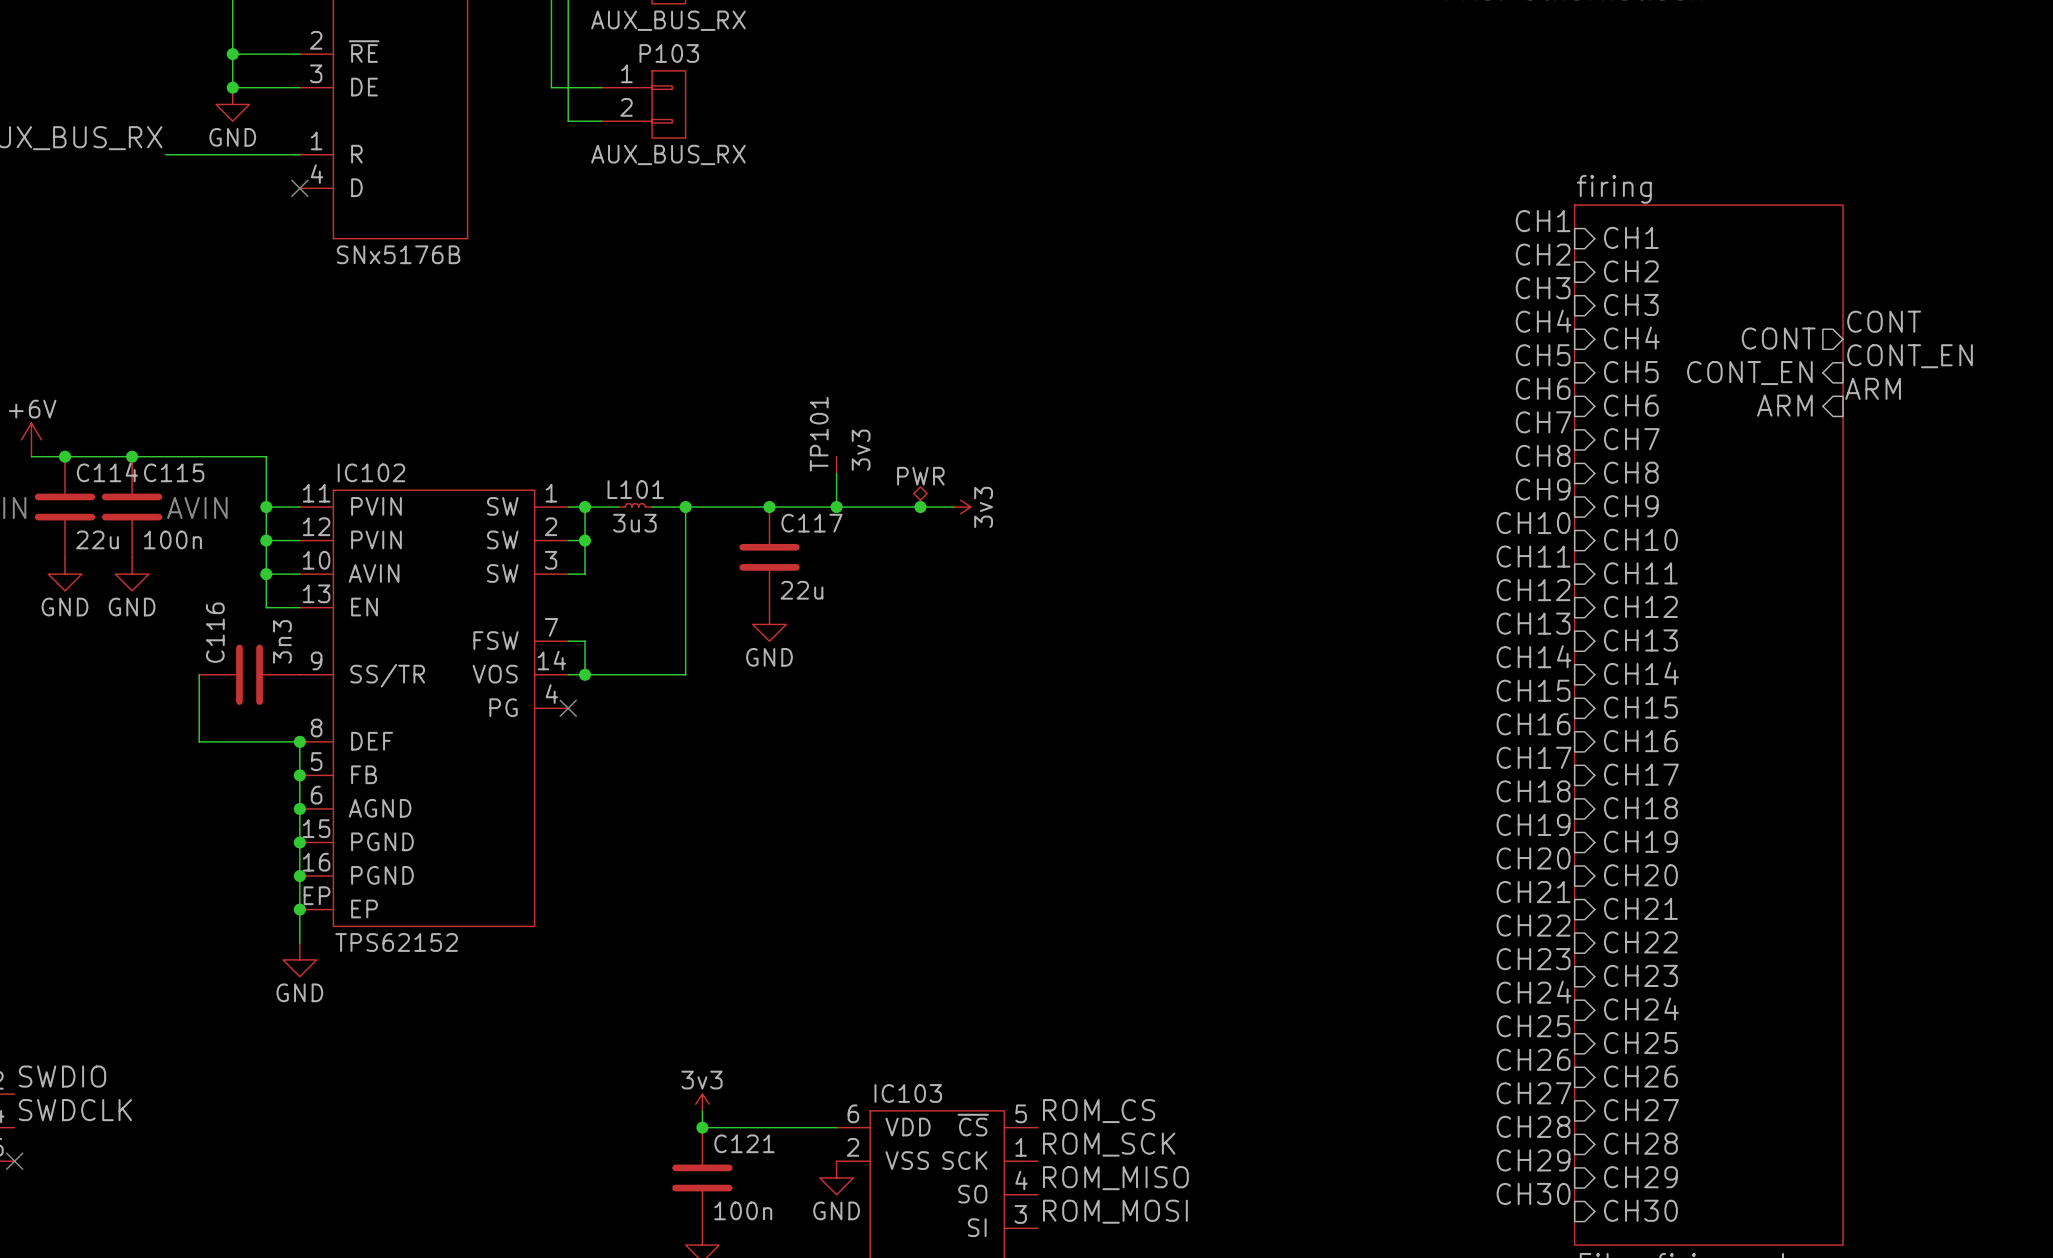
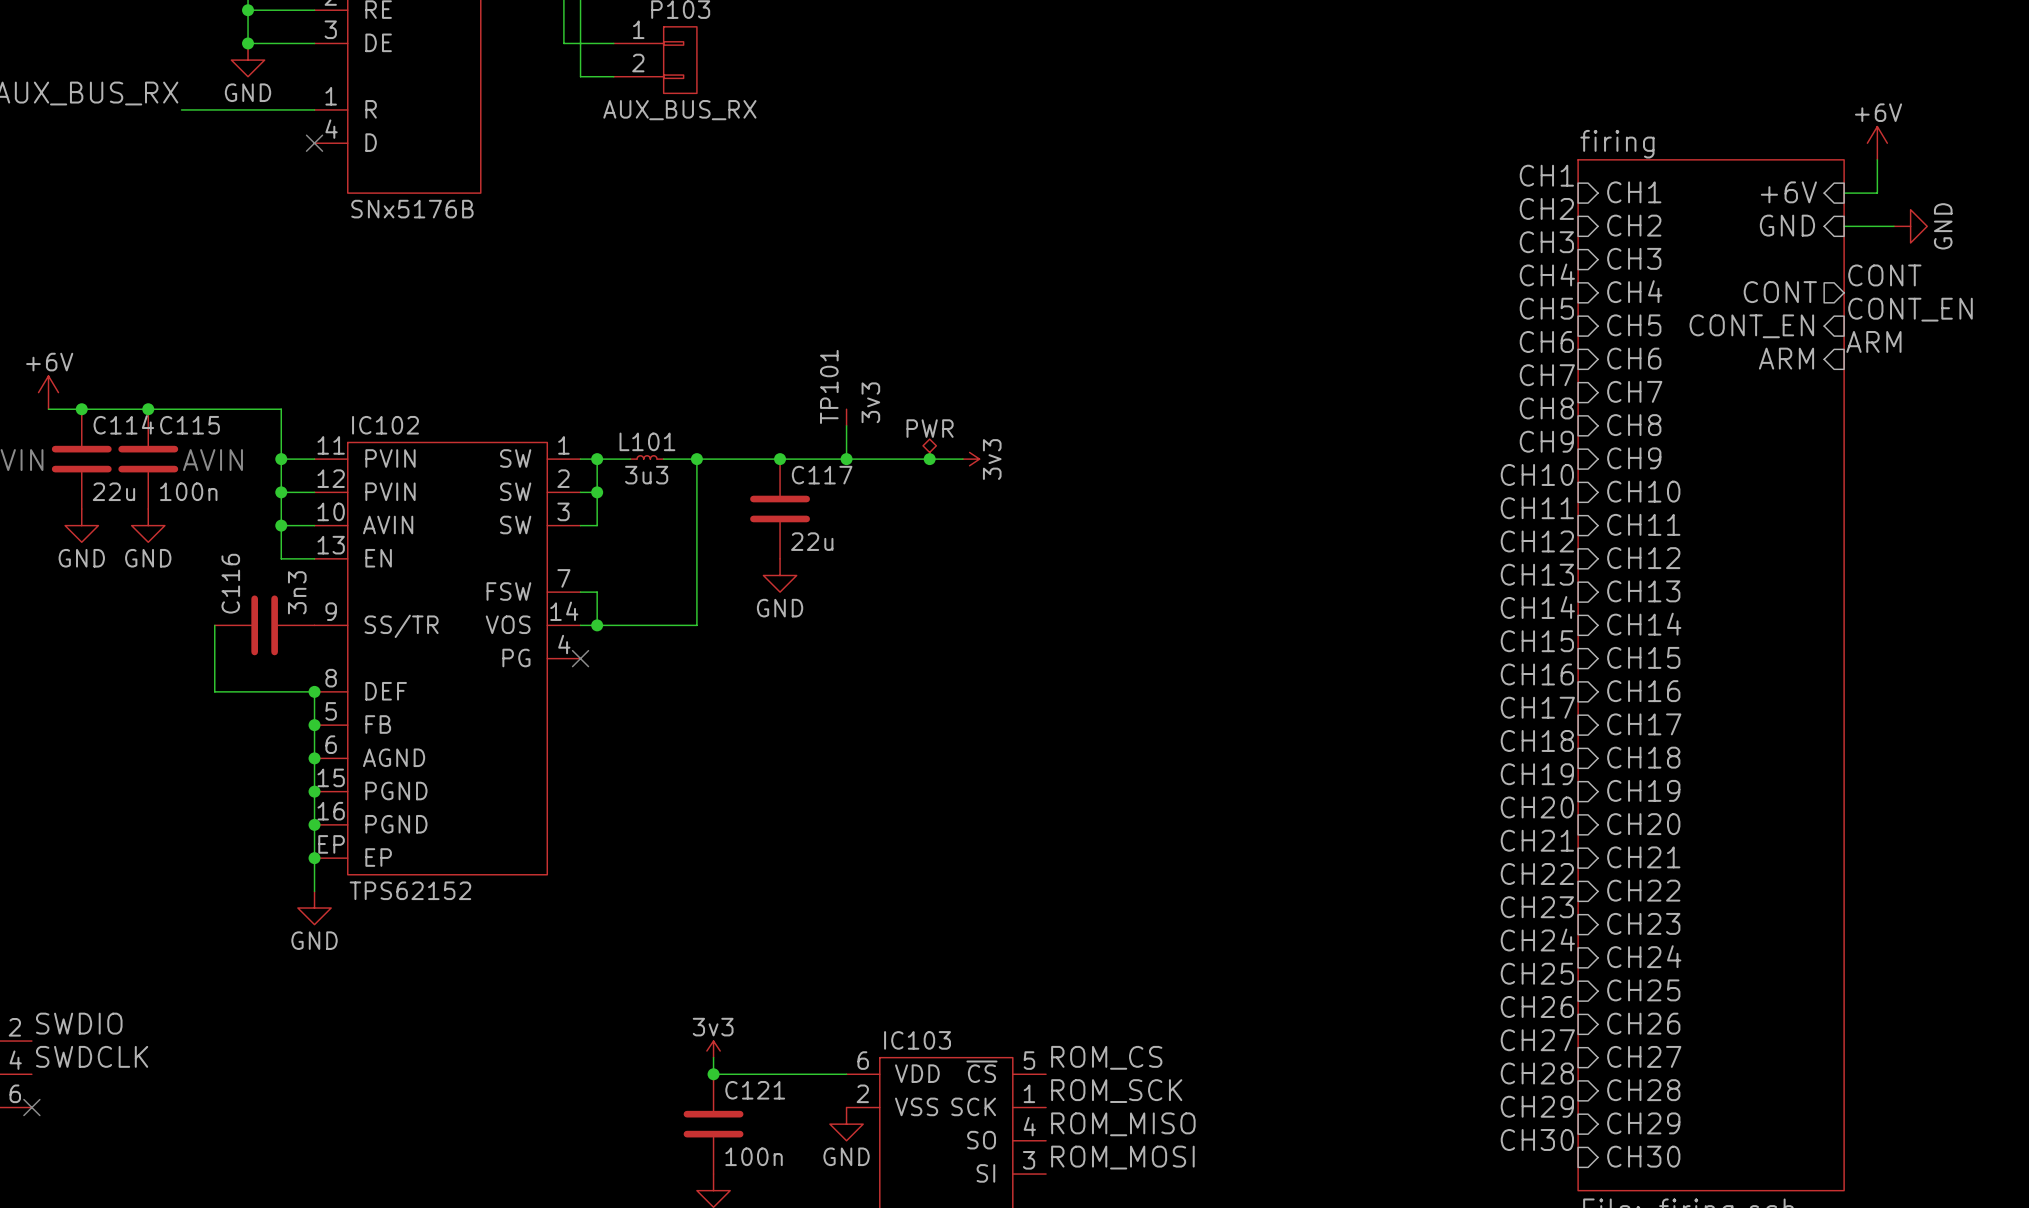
power symbol: none -> +6V (1877, 143)
wire: none -> (1877, 159) (1877, 193) (1844, 193)
sheet pin: none -> +6V (1788, 192)
sheet pin: none -> GND (1787, 225)
wire: none -> (1844, 226) (1893, 226)
power symbol: none -> GND (1910, 226)

